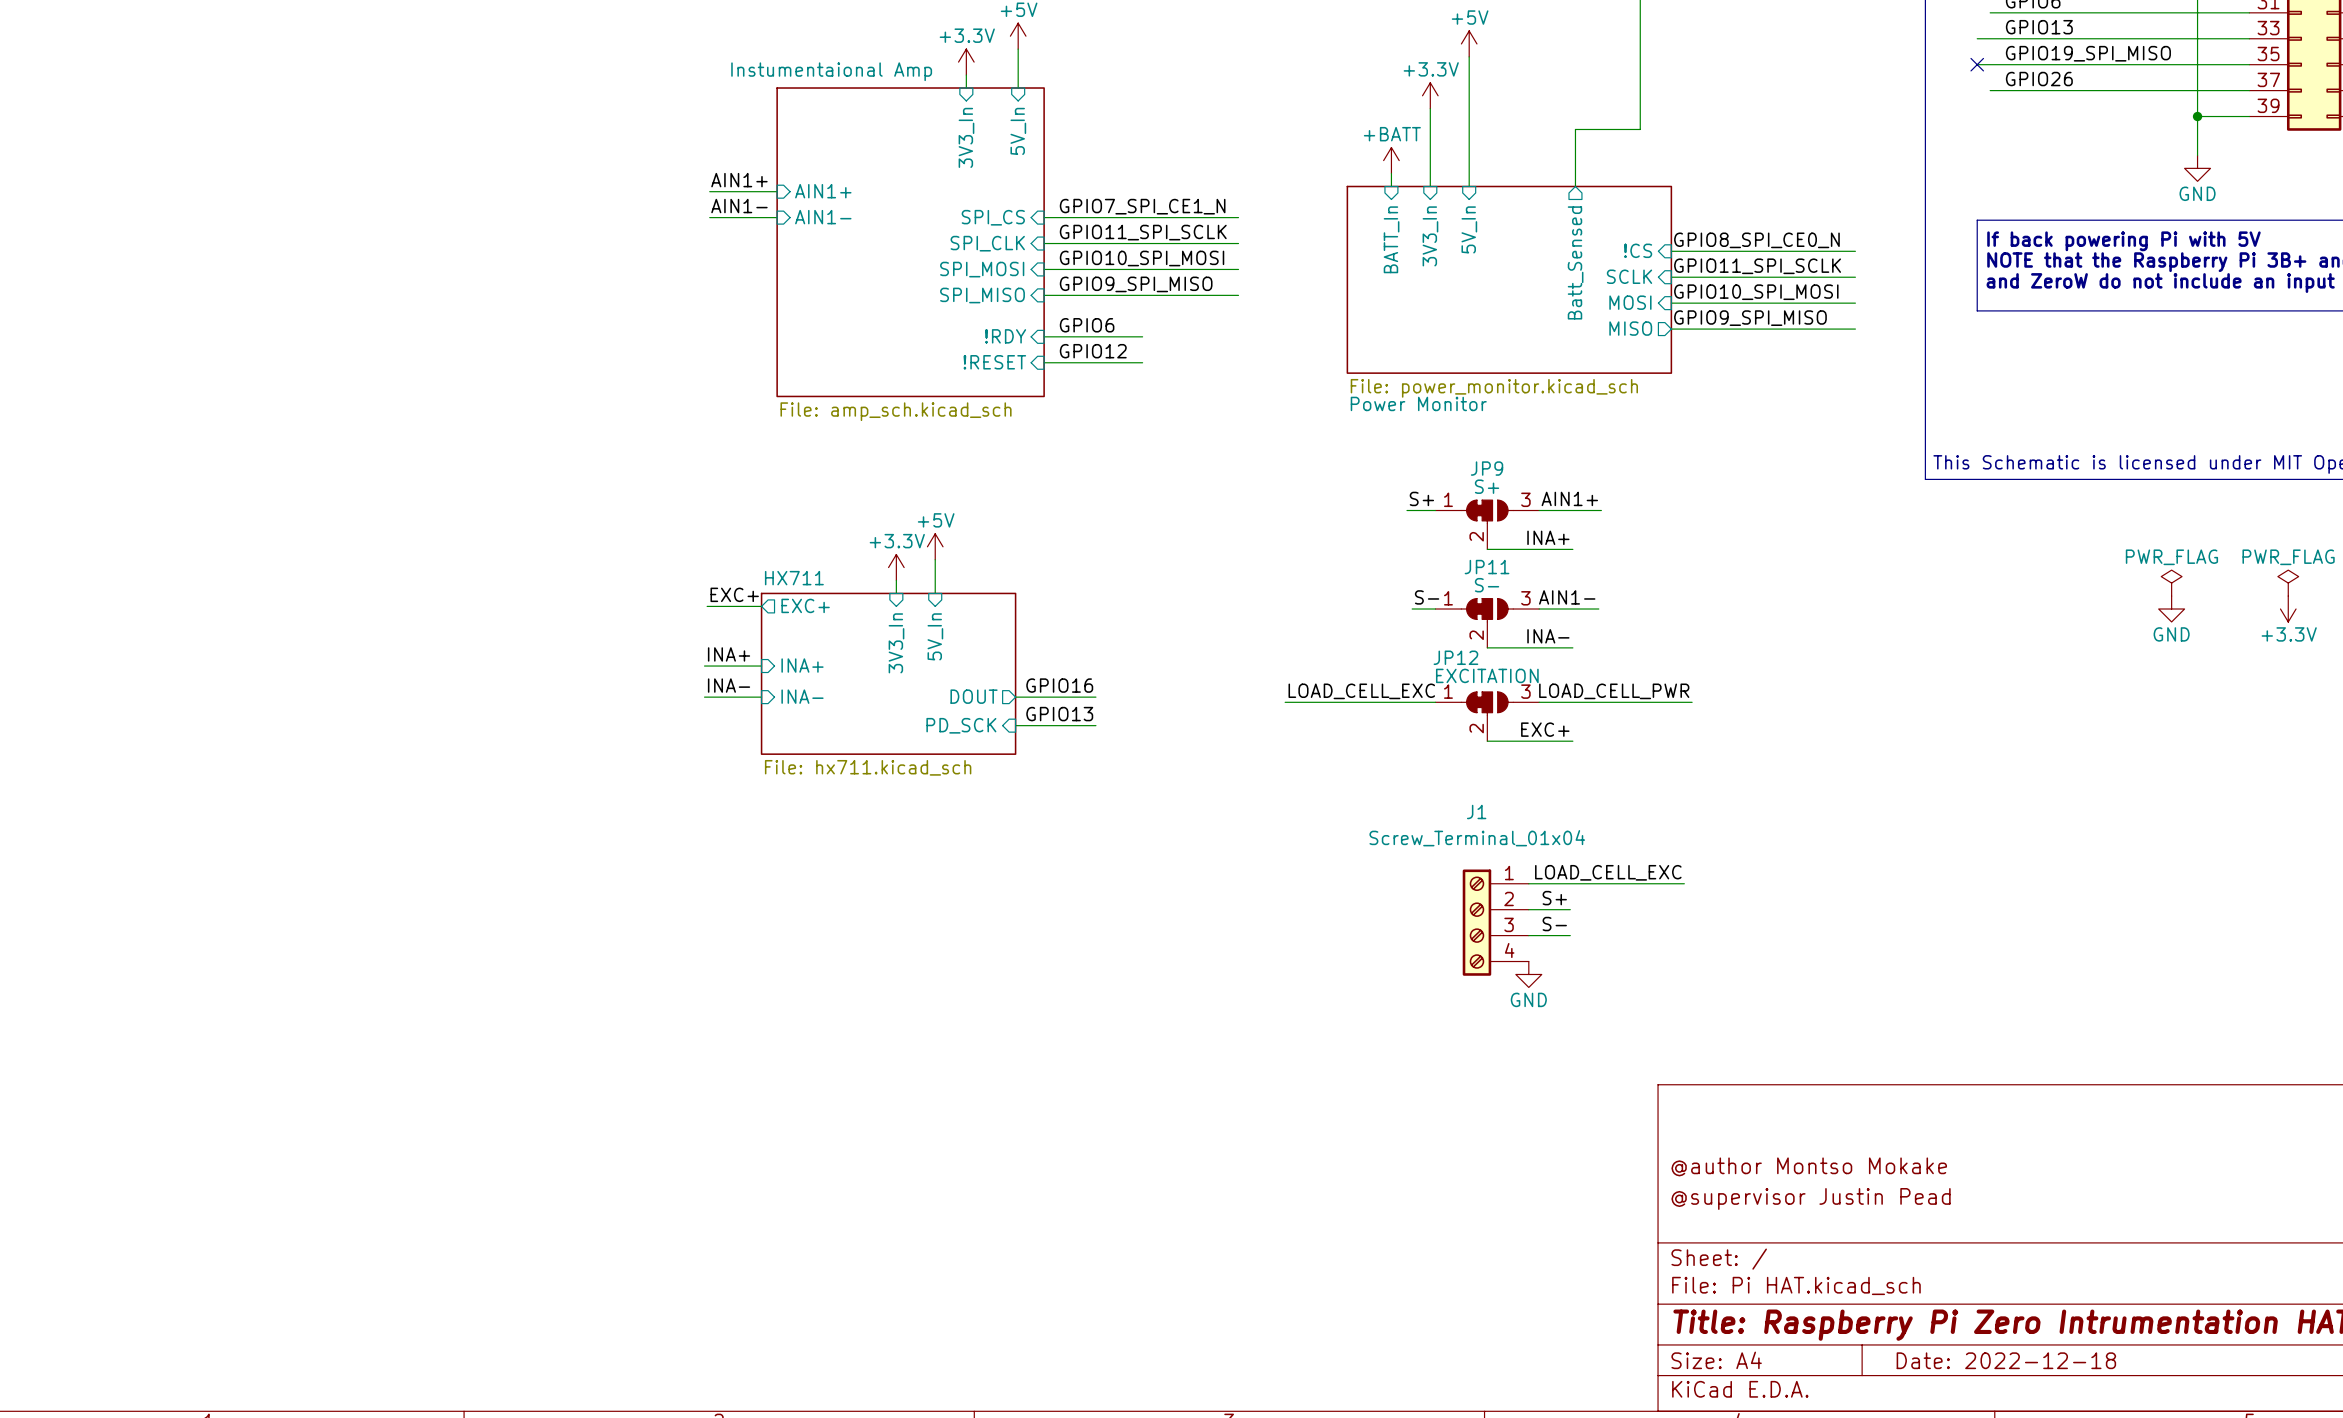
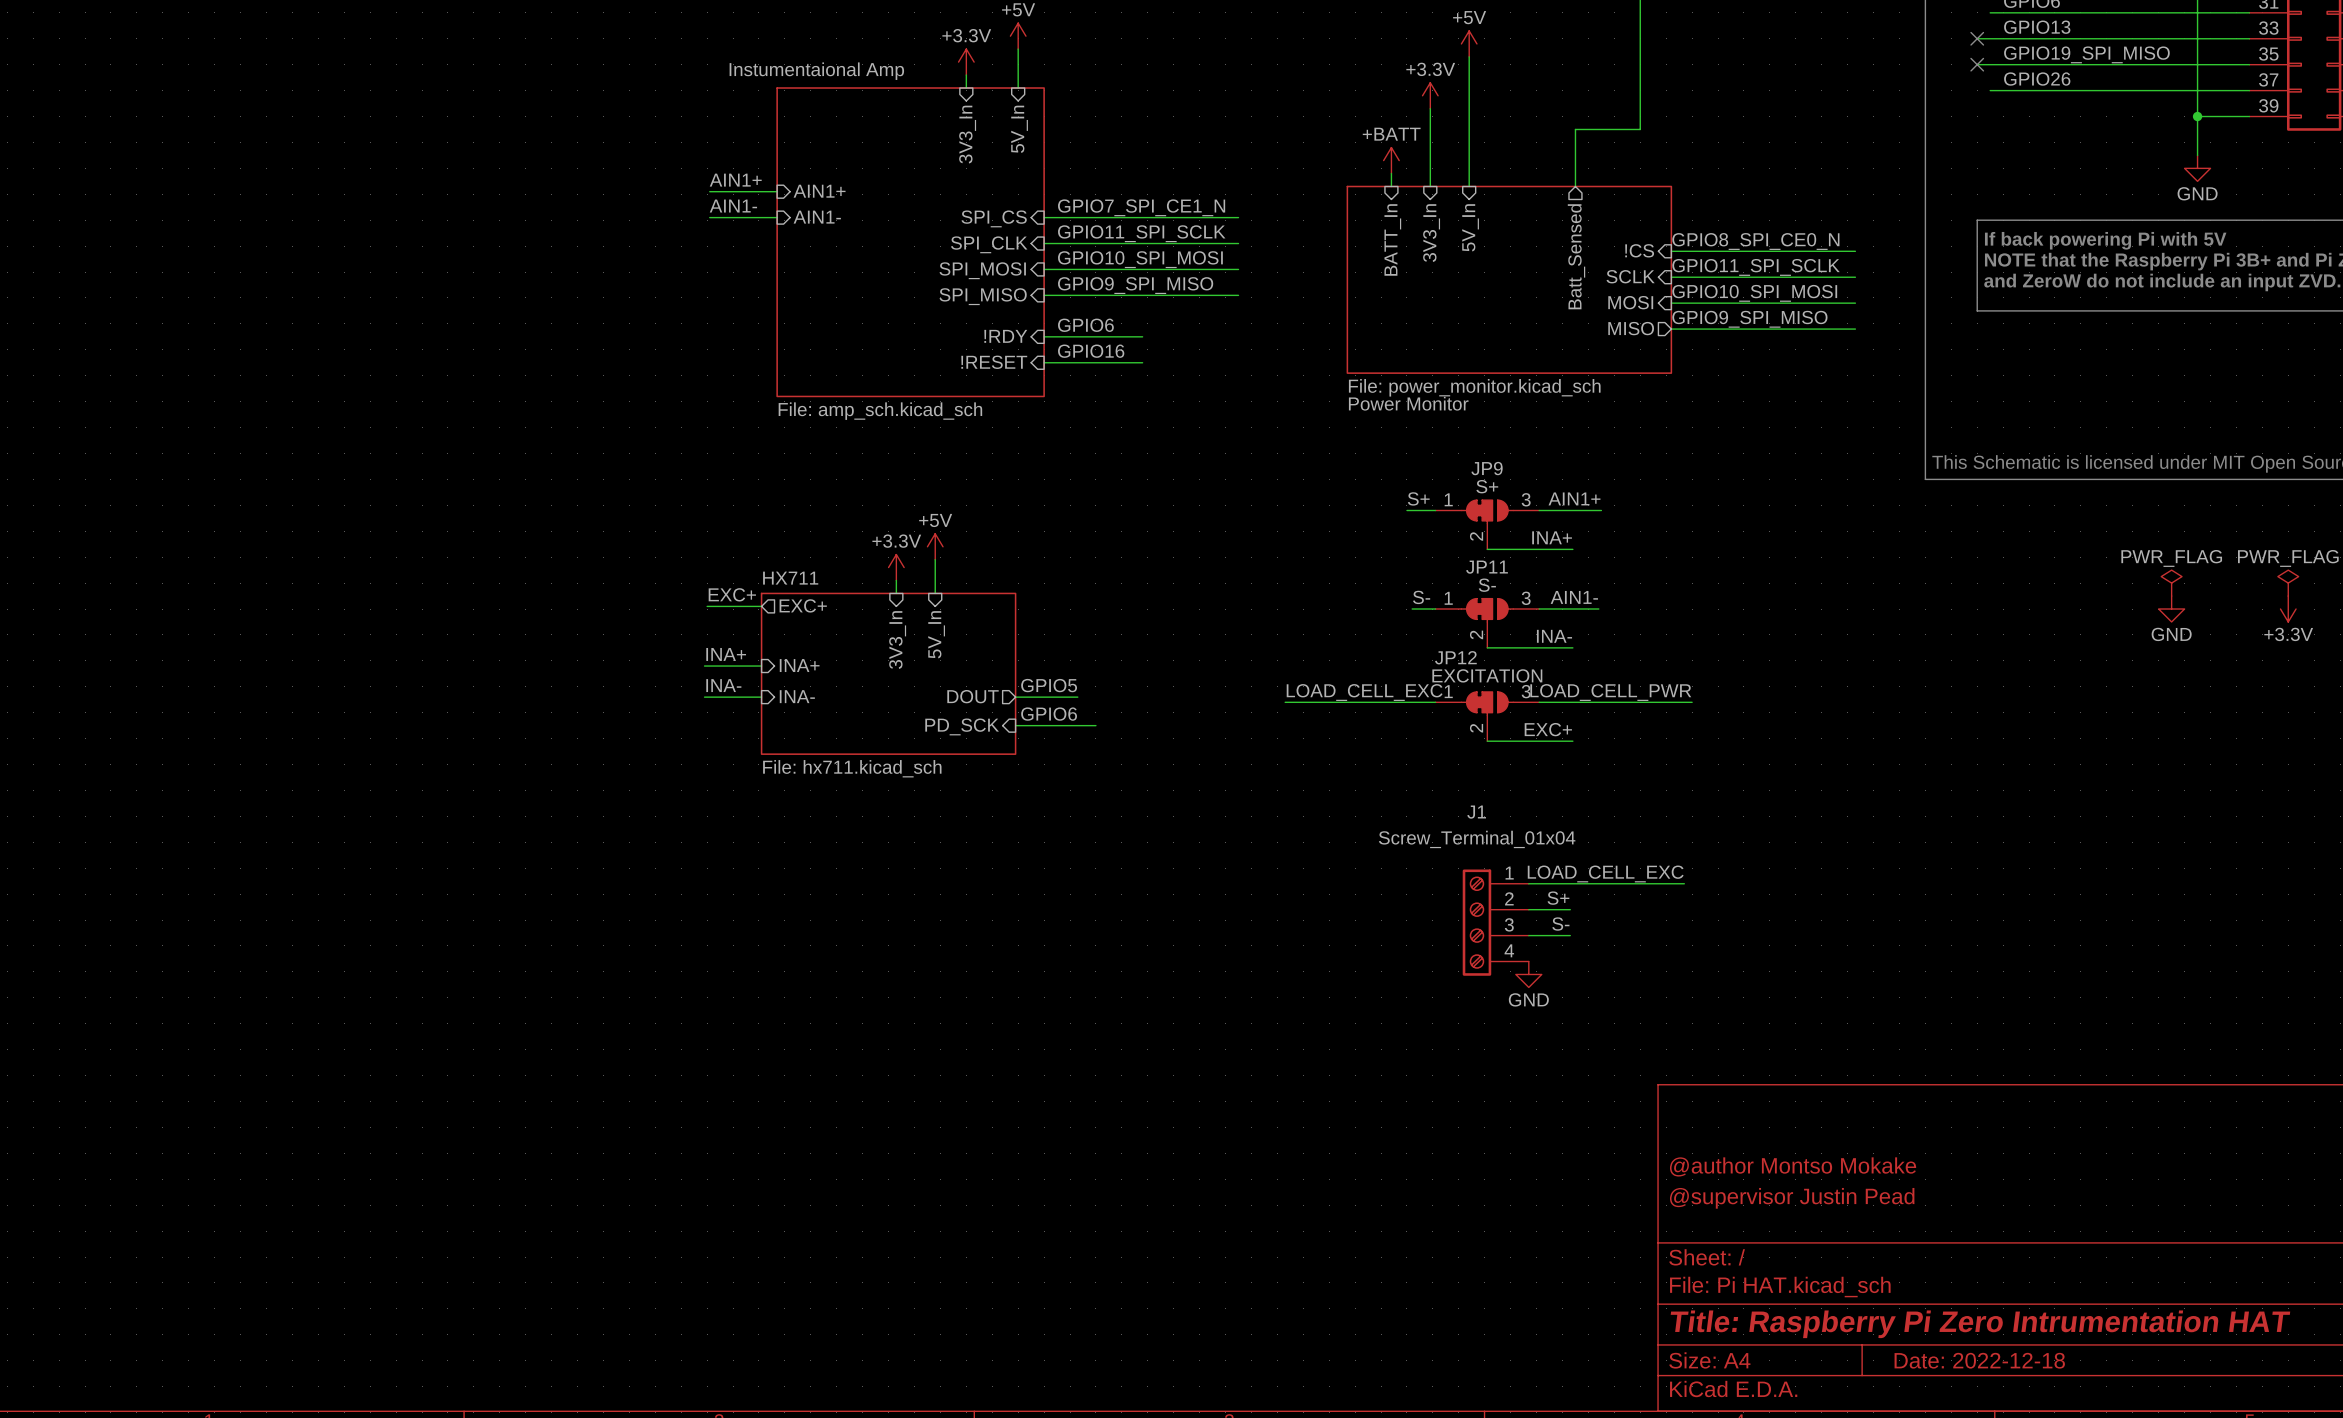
no-connect mark: none -> (1977, 38)
label: GPIO12 (1093, 351) -> GPIO16 (1091, 351)
label: GPIO16 (1059, 685) -> GPIO5 (1049, 685)
wire: (1077, 697) (1095, 697) -> none
label: GPIO13 (1059, 714) -> GPIO6 (1049, 714)

